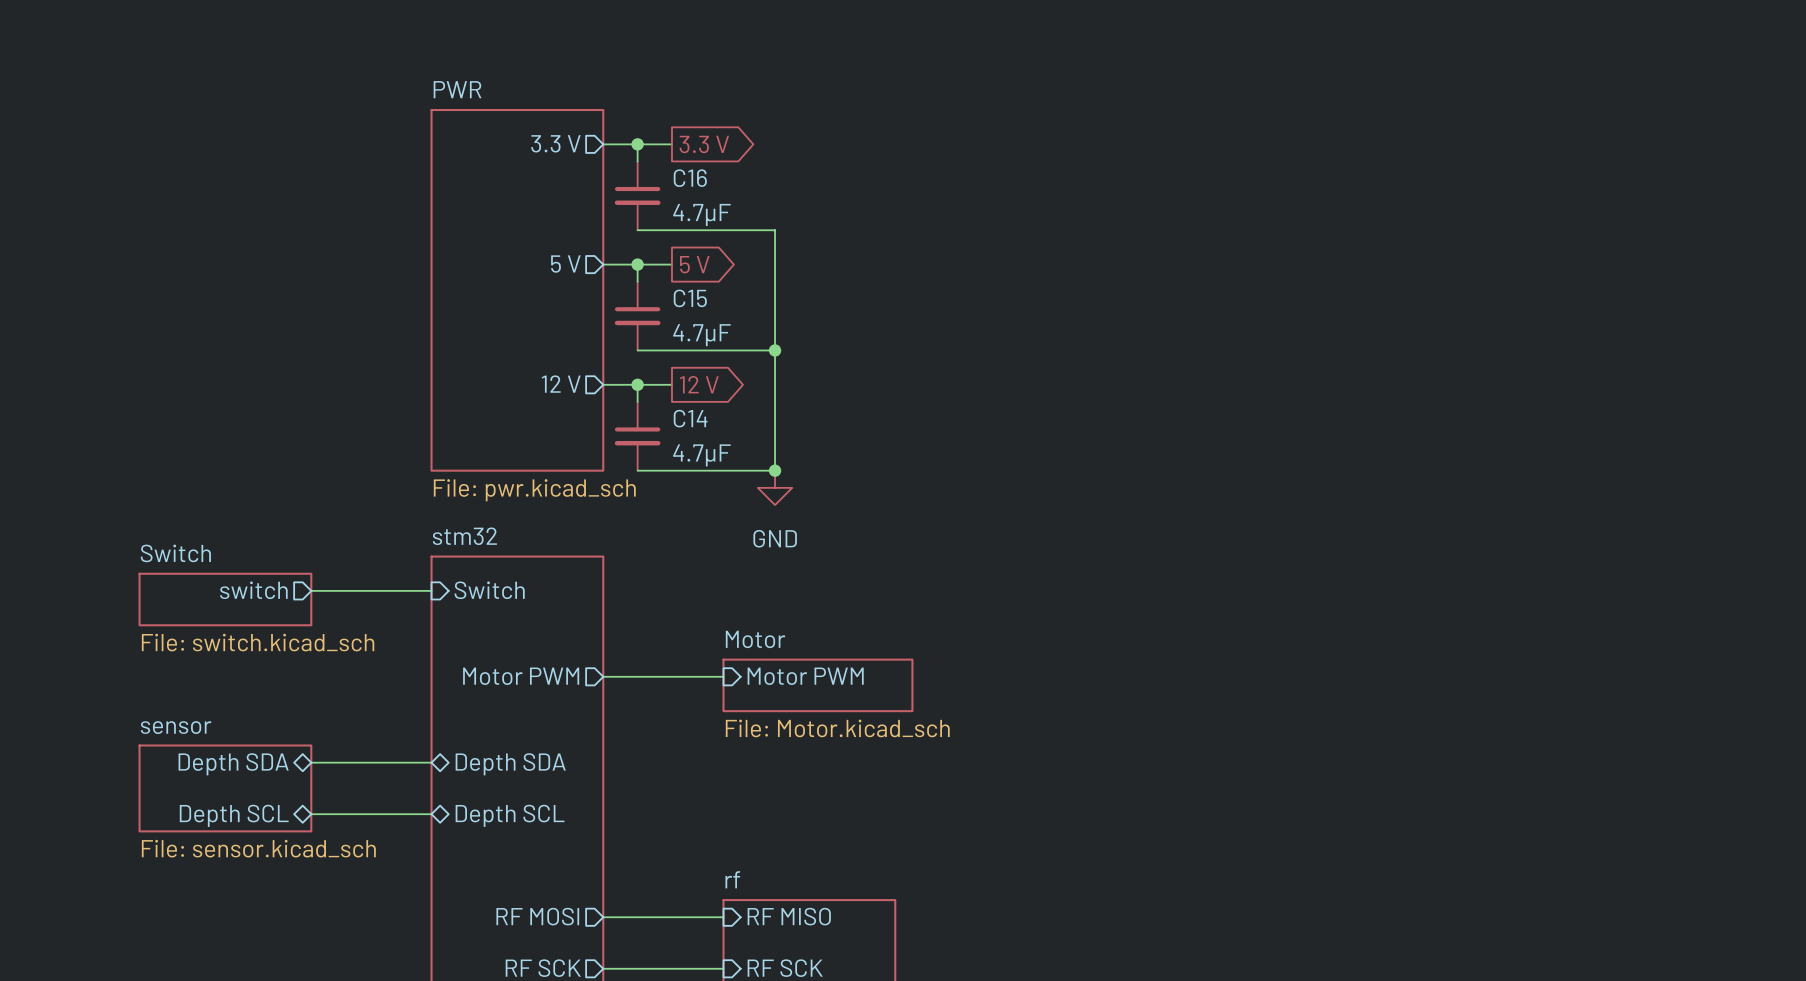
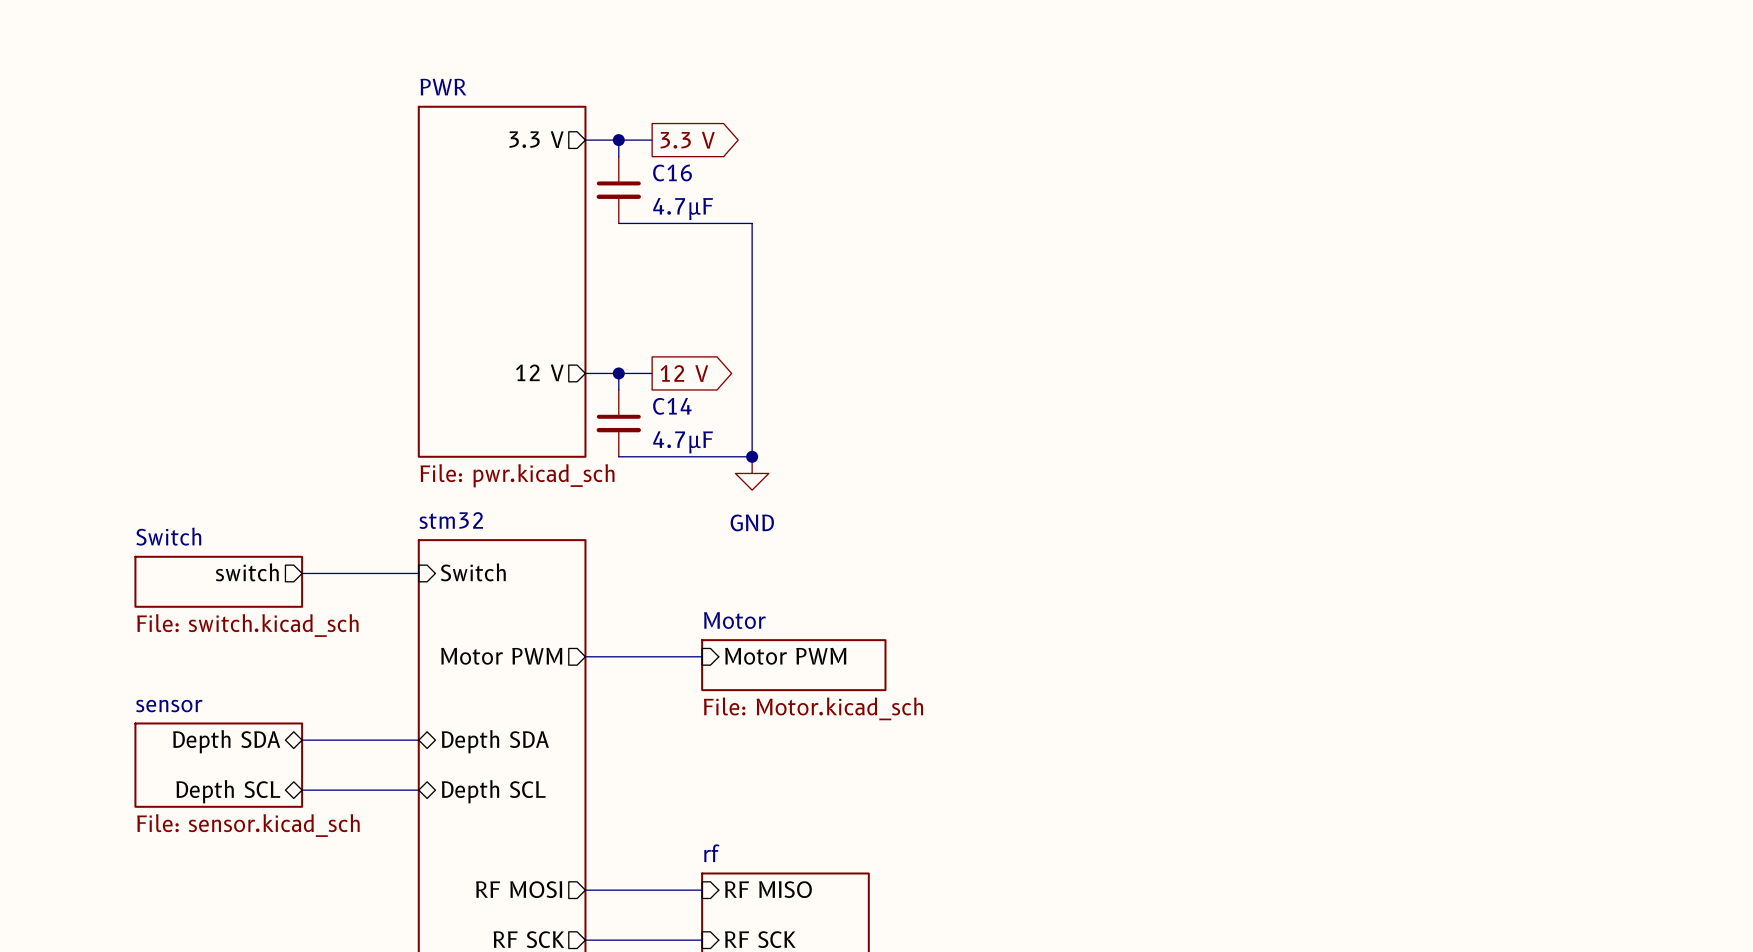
sheet pin: 5 V (565, 264) -> none
wire: (603, 264) (671, 264) -> none
wire: (637, 264) (637, 281) -> none
junction: (637, 264) -> none
global label: 5 V (694, 264) -> none
C15: 4.7µF (637, 316) -> none
wire: (637, 350) (775, 350) -> none
junction: (775, 350) -> none

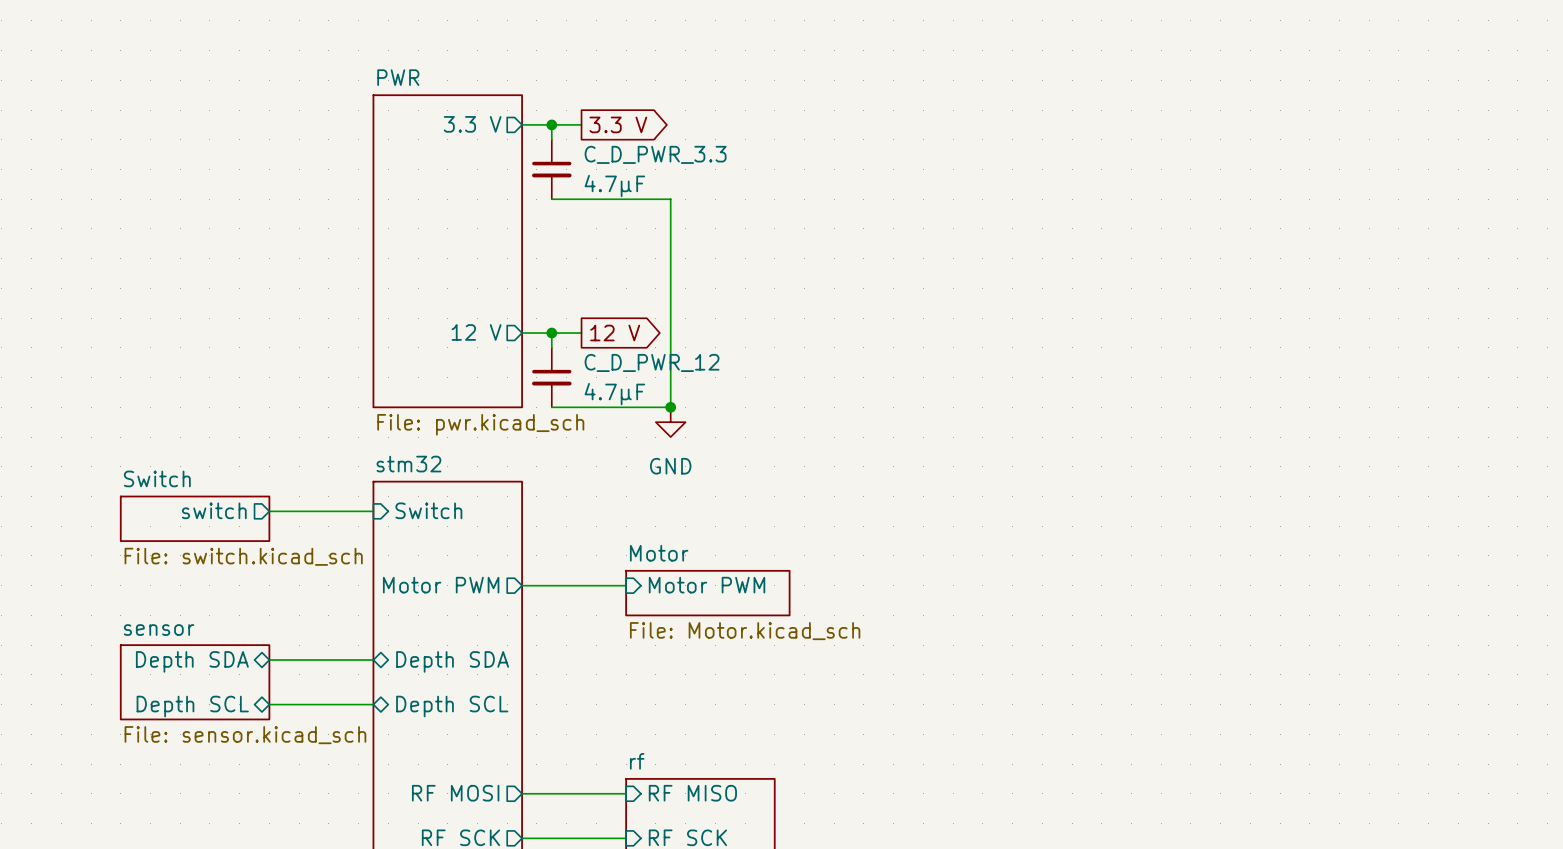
C16 name: C16 (672, 172) -> C_D_PWR_3.3 (655, 154)
C14 name: C14 (672, 406) -> C_D_PWR_12 (652, 362)

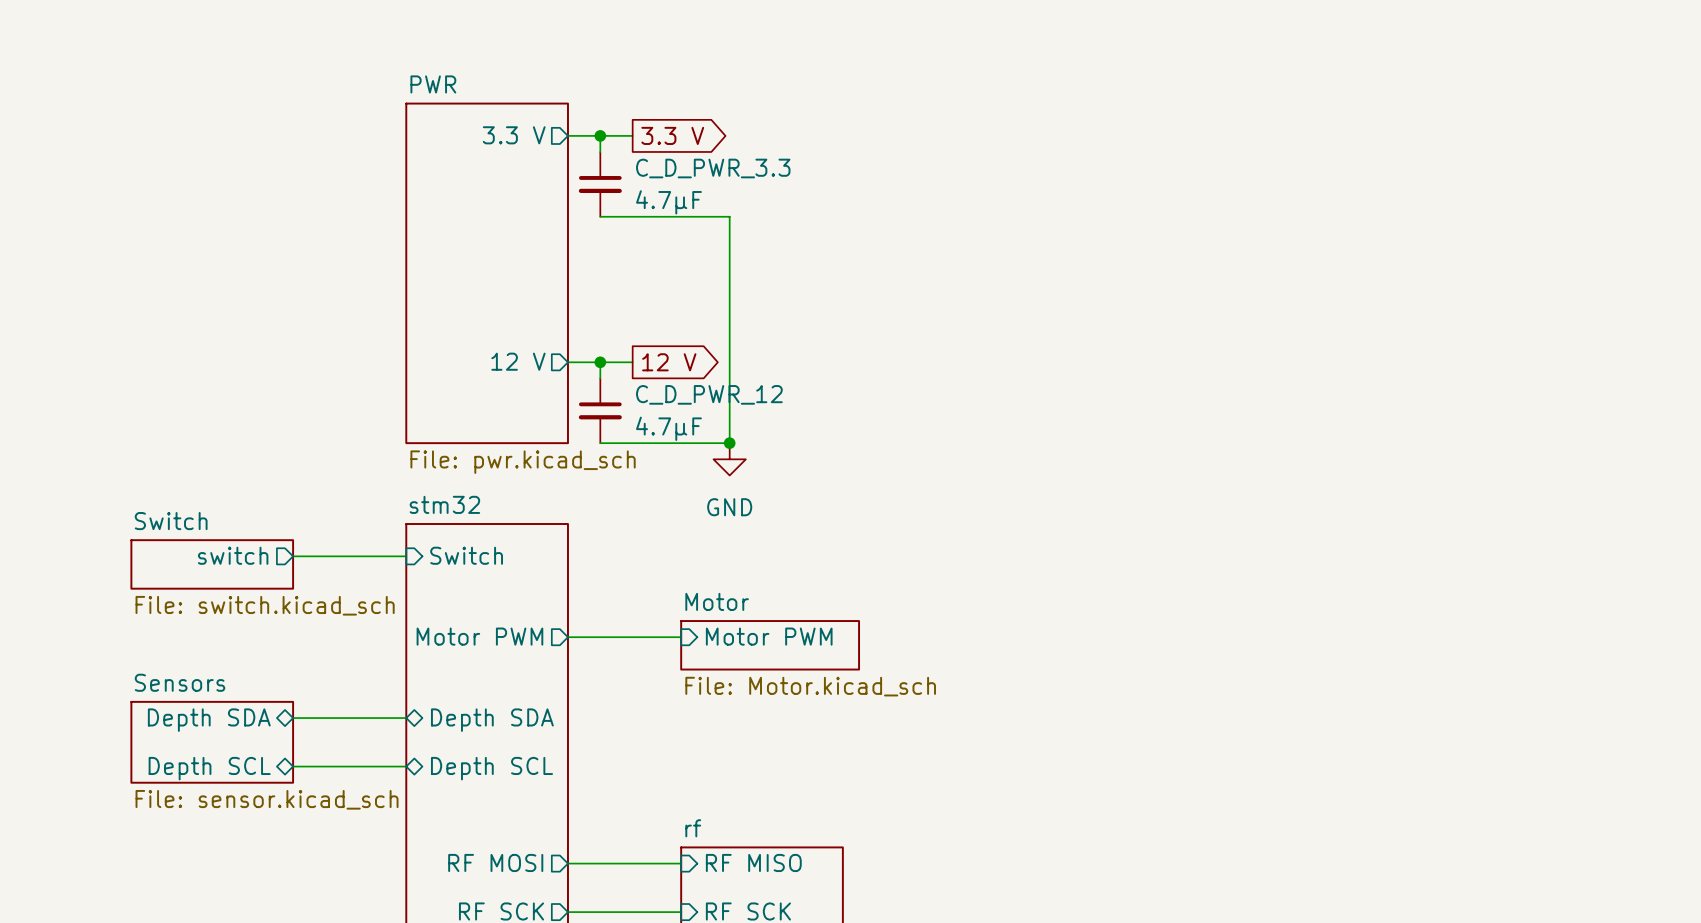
sheet sensor name: sensor (159, 630) -> Sensors (180, 682)

